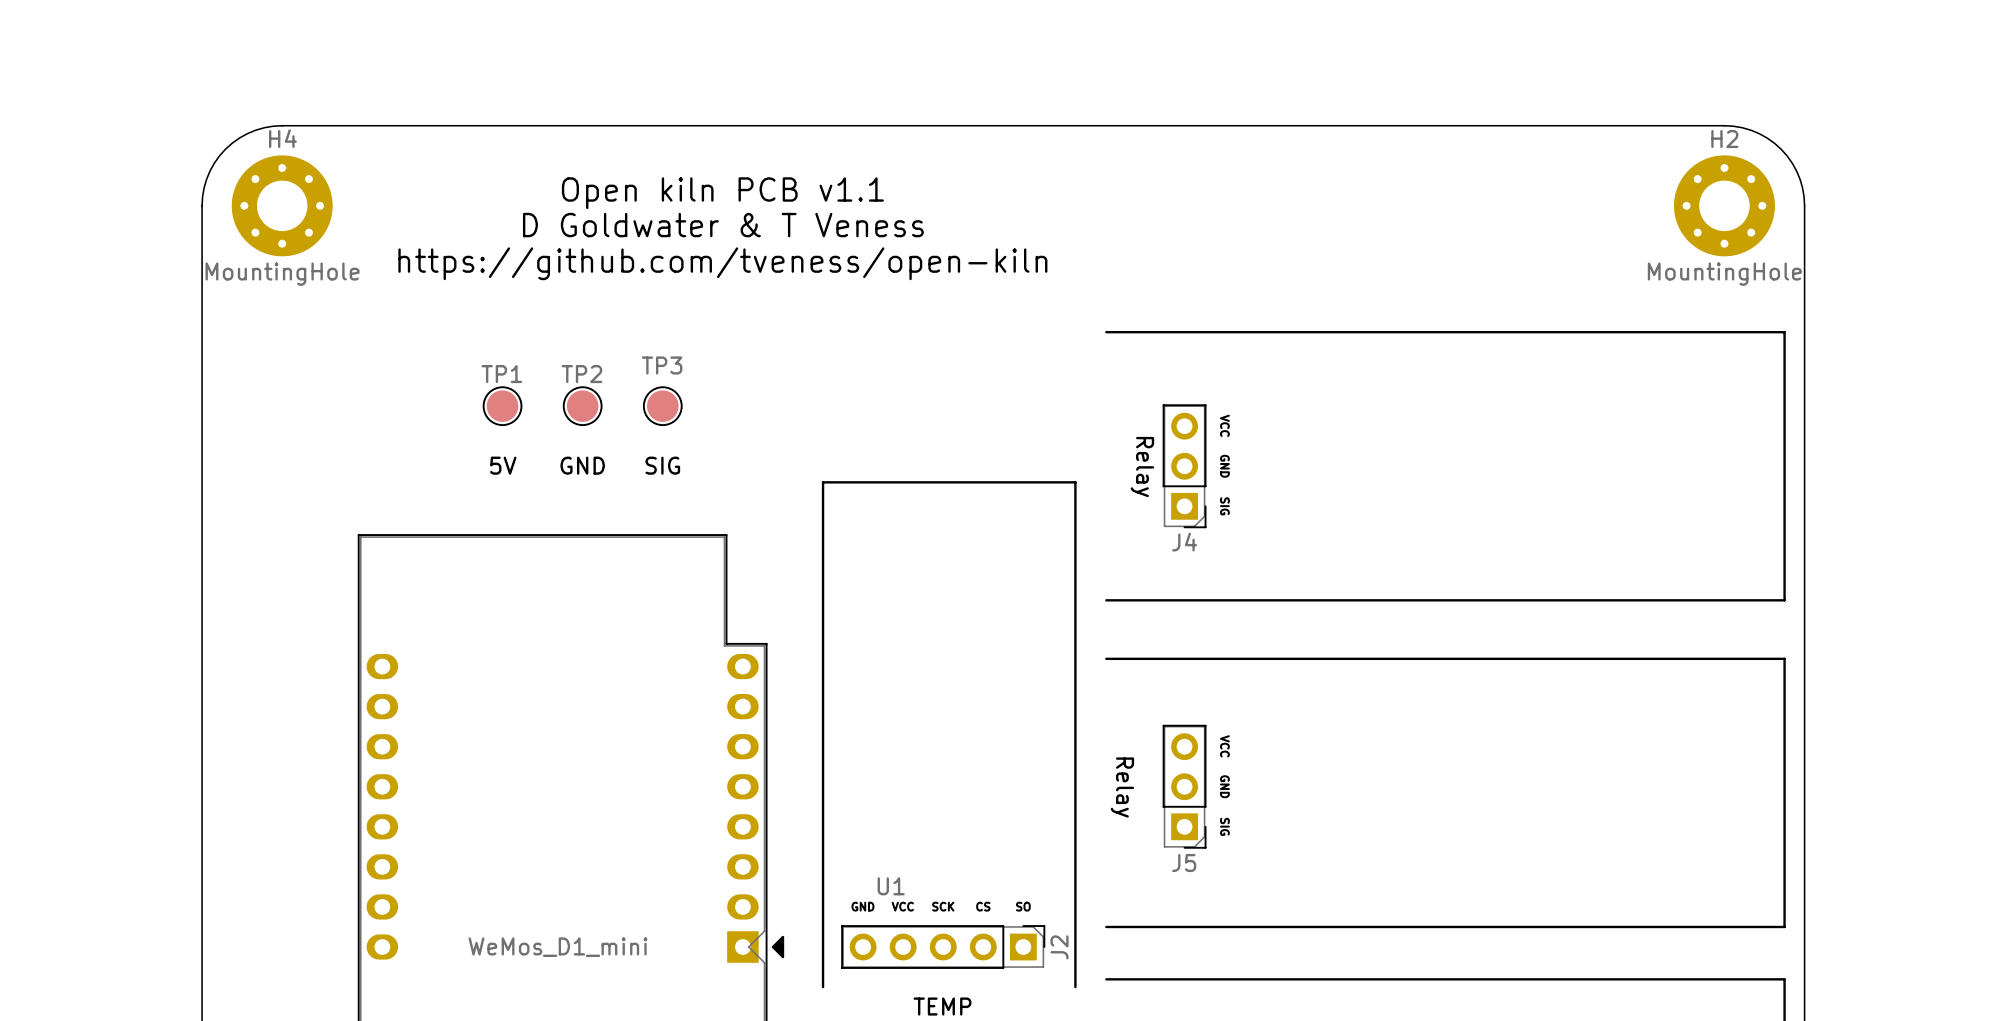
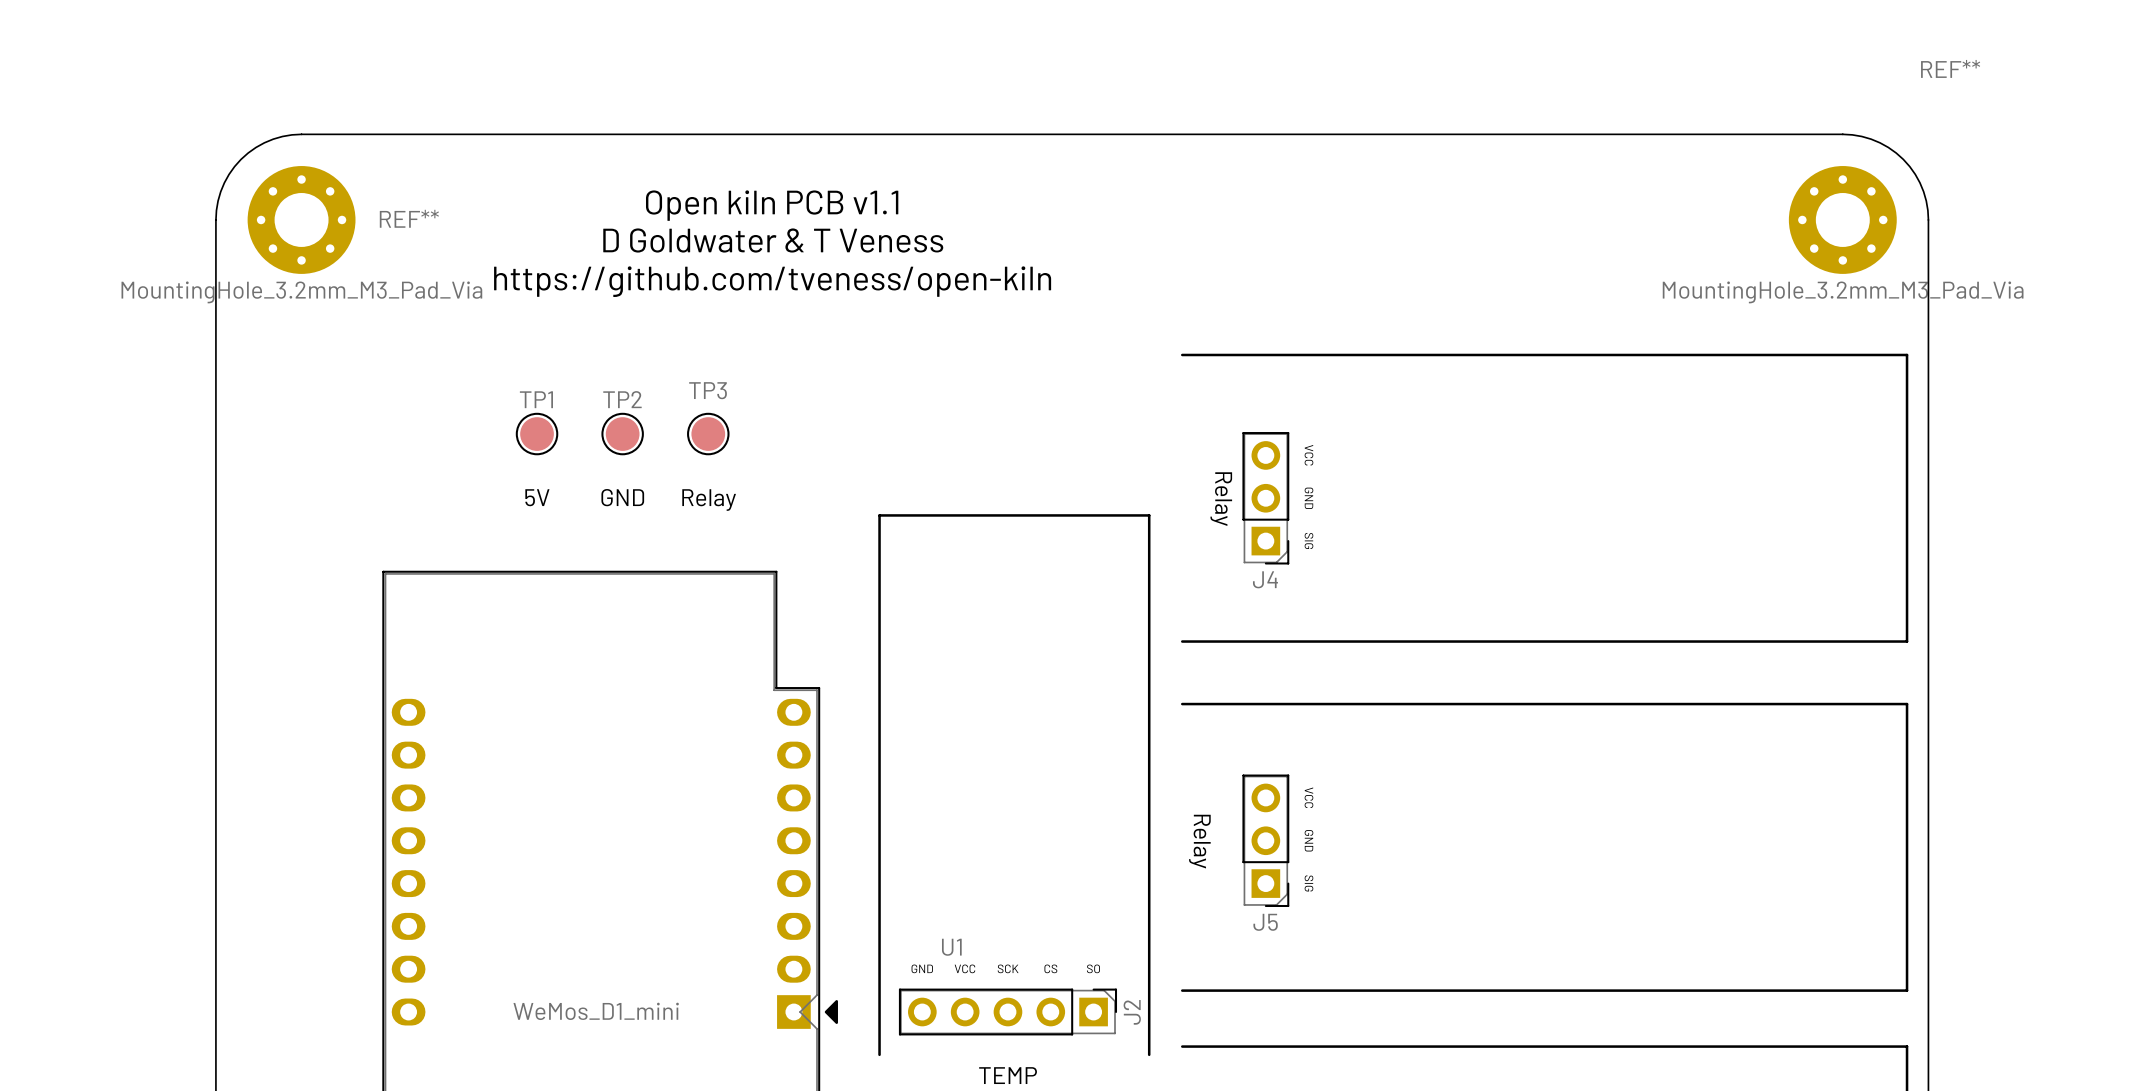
H4 name: H4 (282, 138) -> REF** (409, 218)
H2 name: H2 (1724, 139) -> REF** (1950, 68)
H4 value: MountingHole (282, 274) -> MountingHole_3.2mm_M3_Pad_Via (301, 292)
H2 value: MountingHole (1724, 274) -> MountingHole_3.2mm_M3_Pad_Via (1843, 292)
TP3 value: SIG (662, 465) -> Relay (709, 500)

